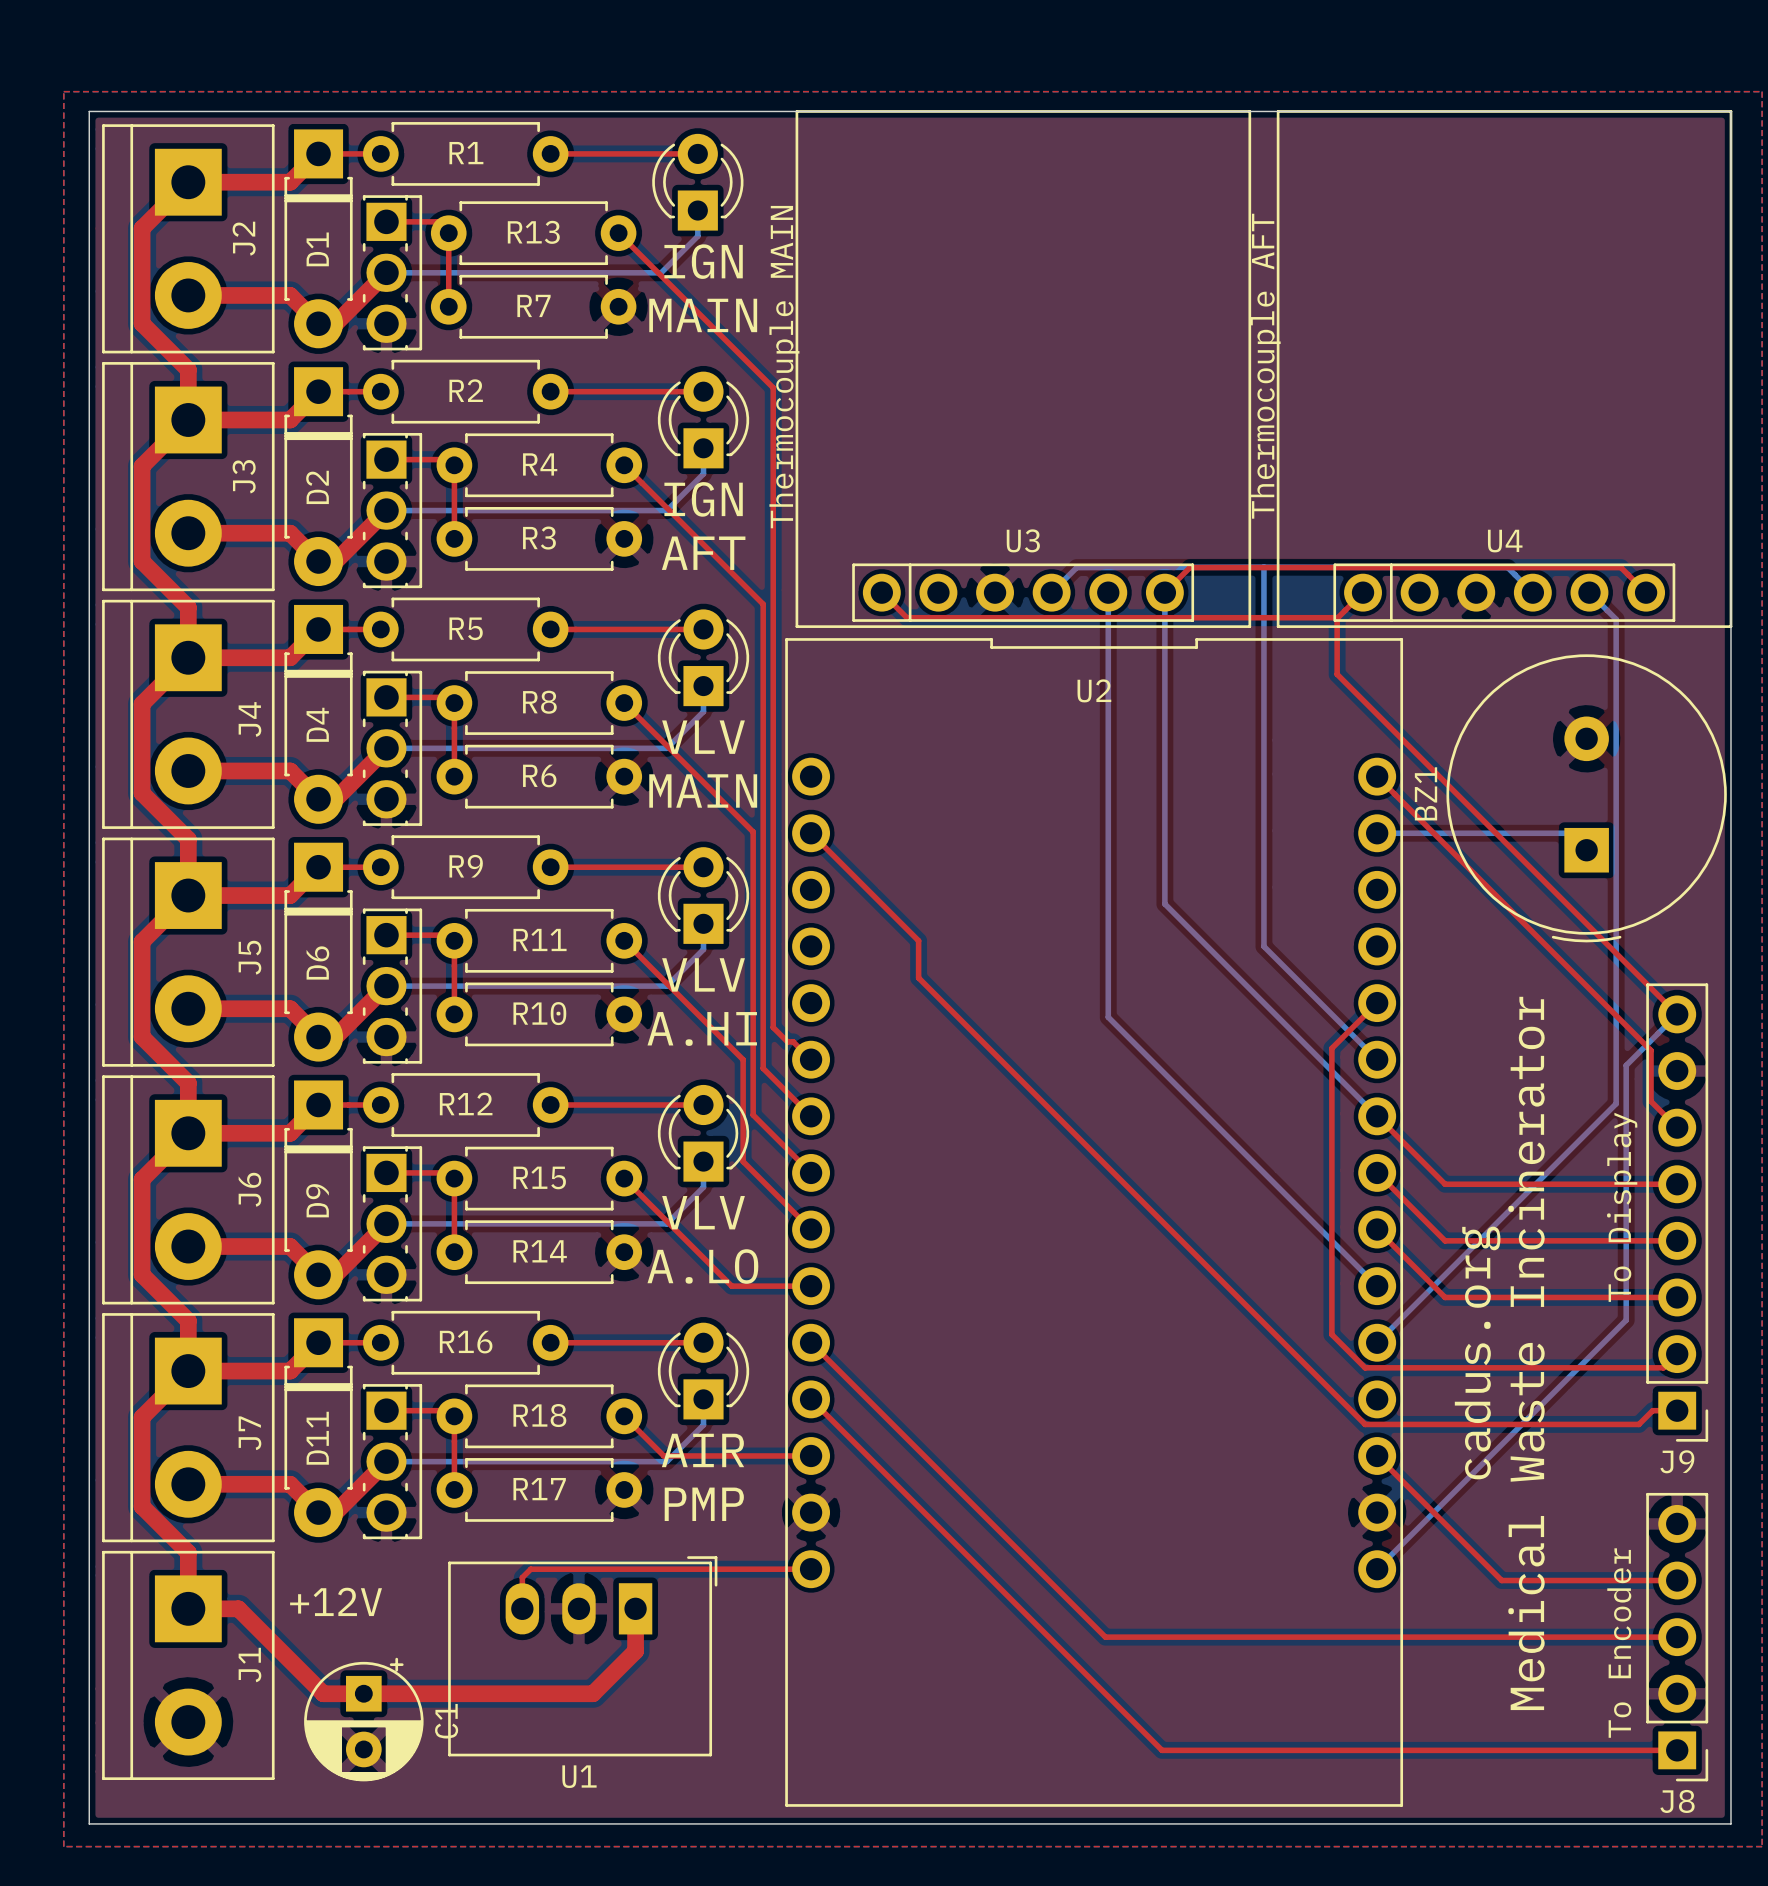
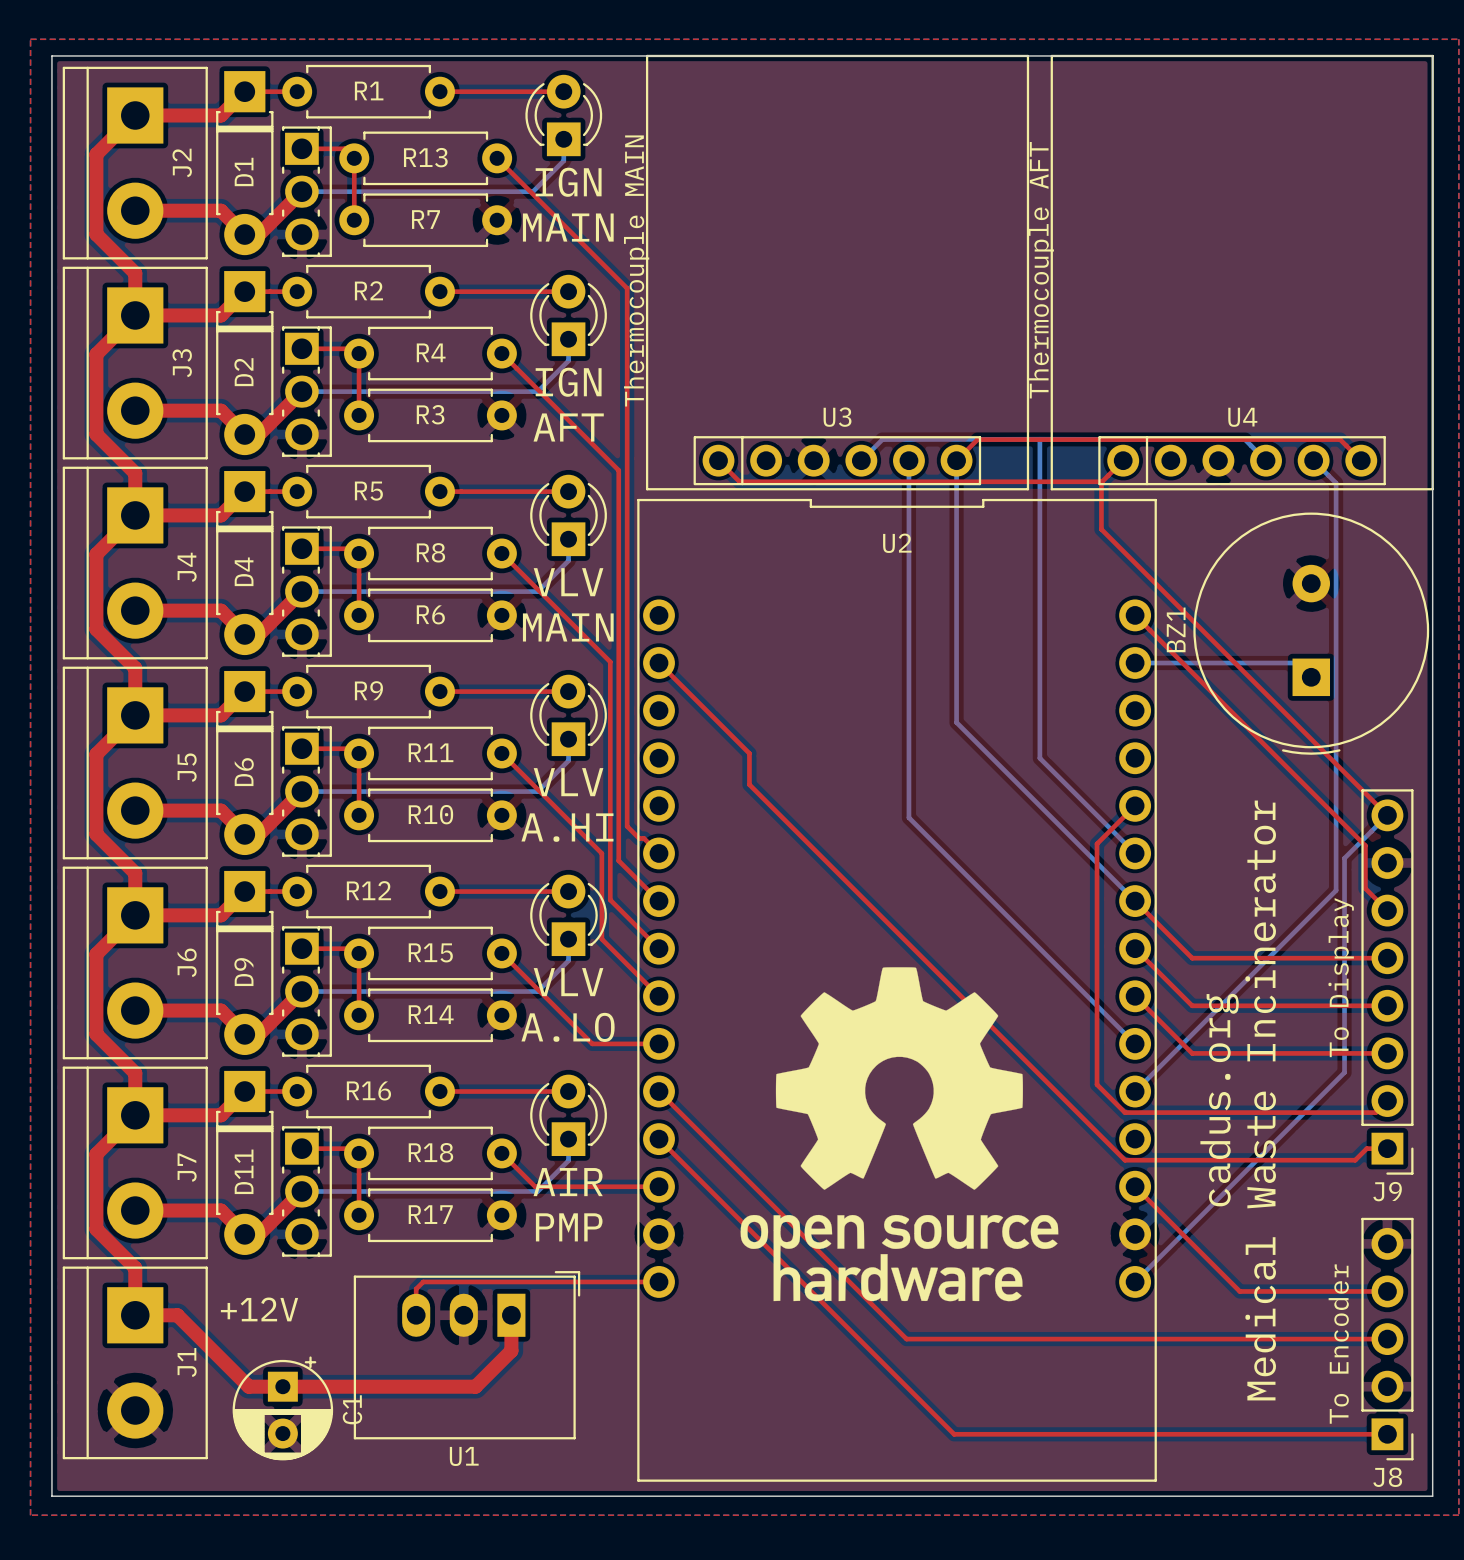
drawing: none -> [740, 967, 1059, 1302]

